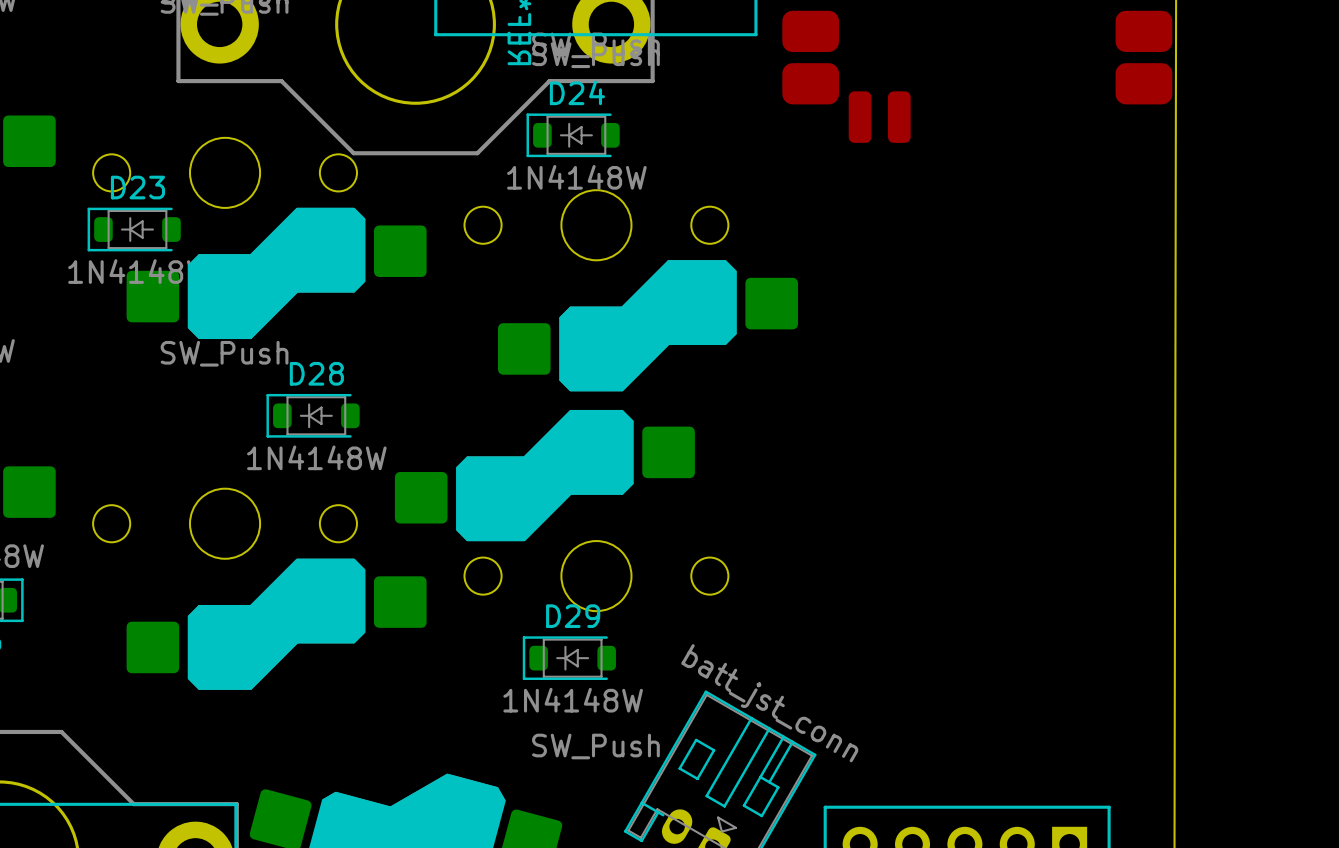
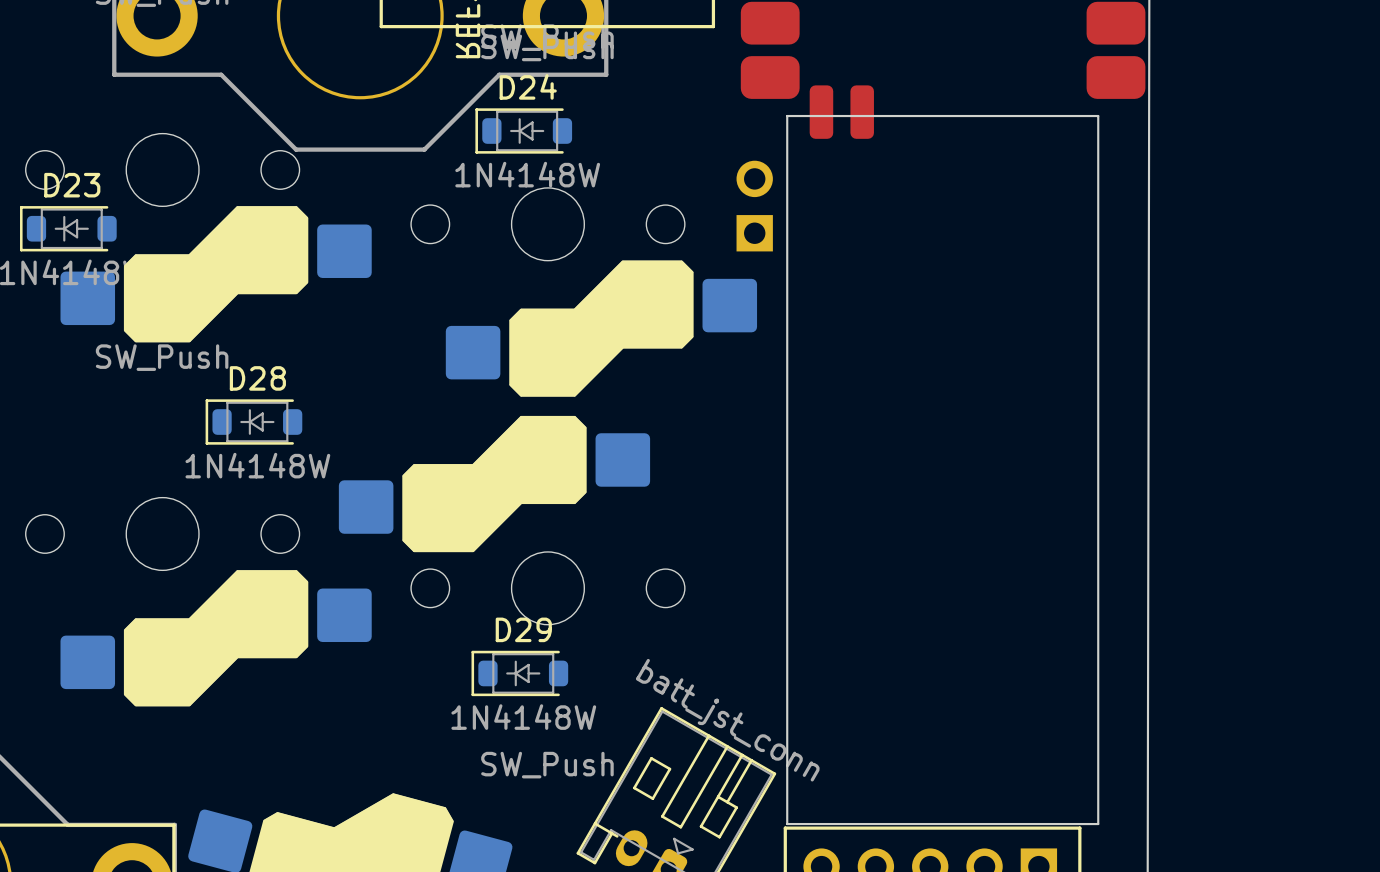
board edge: none -> (1098, 116) (787, 116) (787, 824) (1098, 824) (1098, 116)
part: none -> (754, 206)

